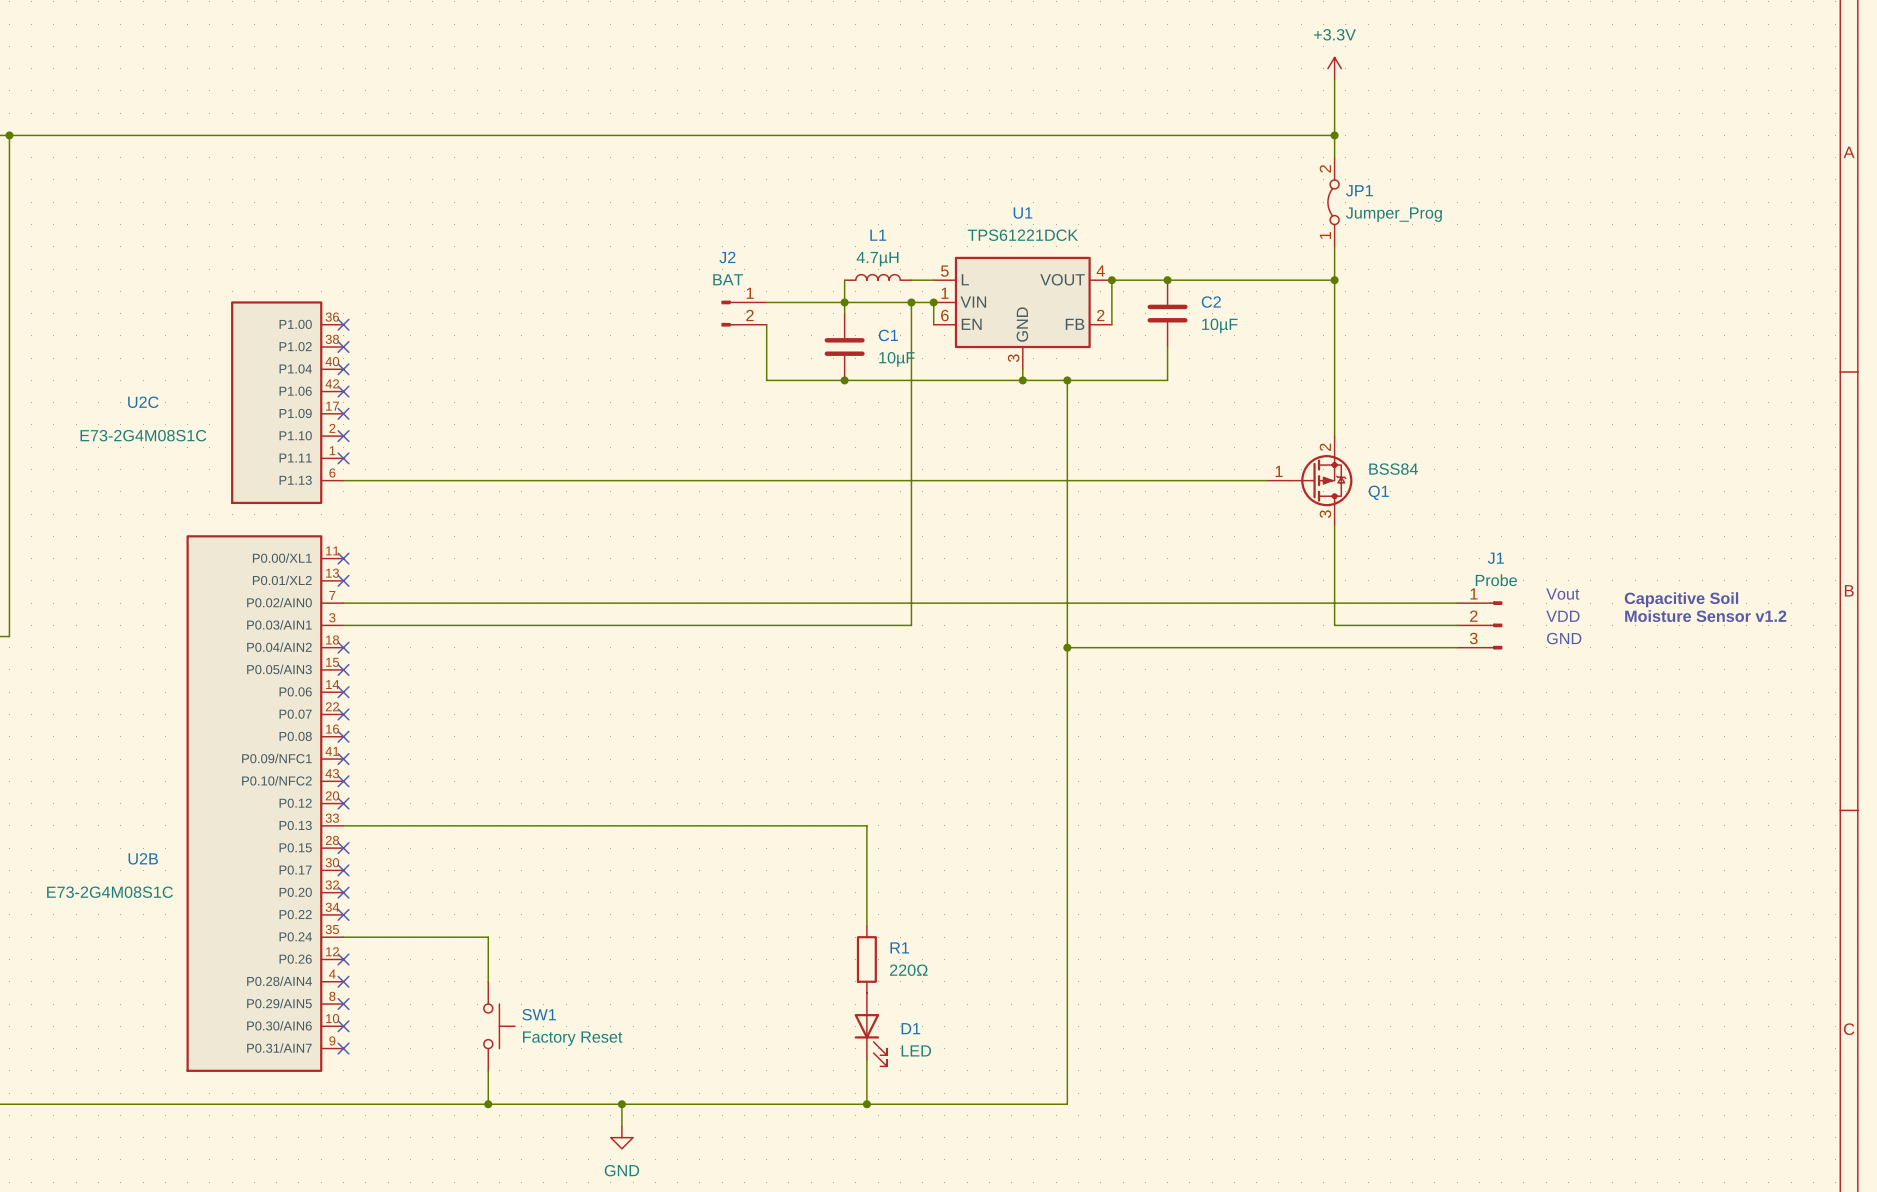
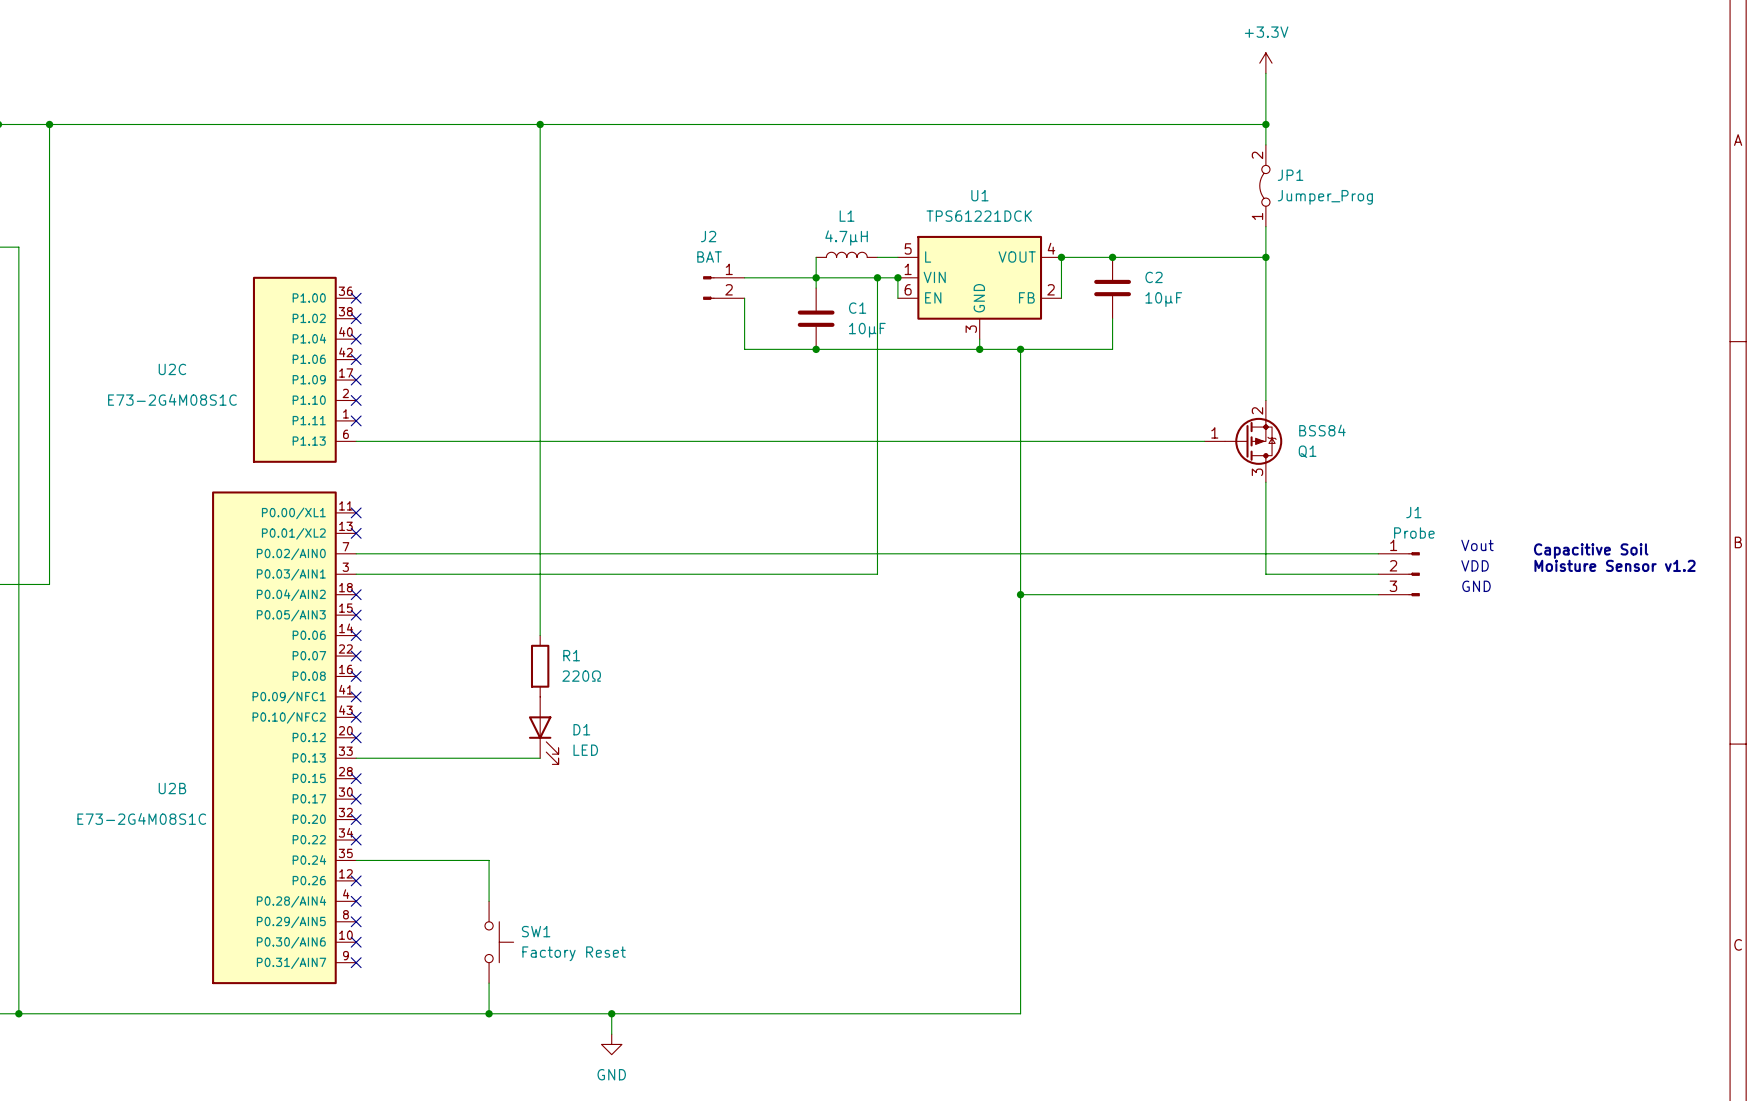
wire: none -> (540, 124) (540, 635)
junction: none -> (540, 124)
wire: (543, 825) (866, 825) (866, 926) -> none
R1 position: (866, 959) -> (540, 666)
D1 position: (870, 1029) -> (543, 730)
wire: (866, 1059) (866, 1104) -> none
junction: (866, 1104) -> none

